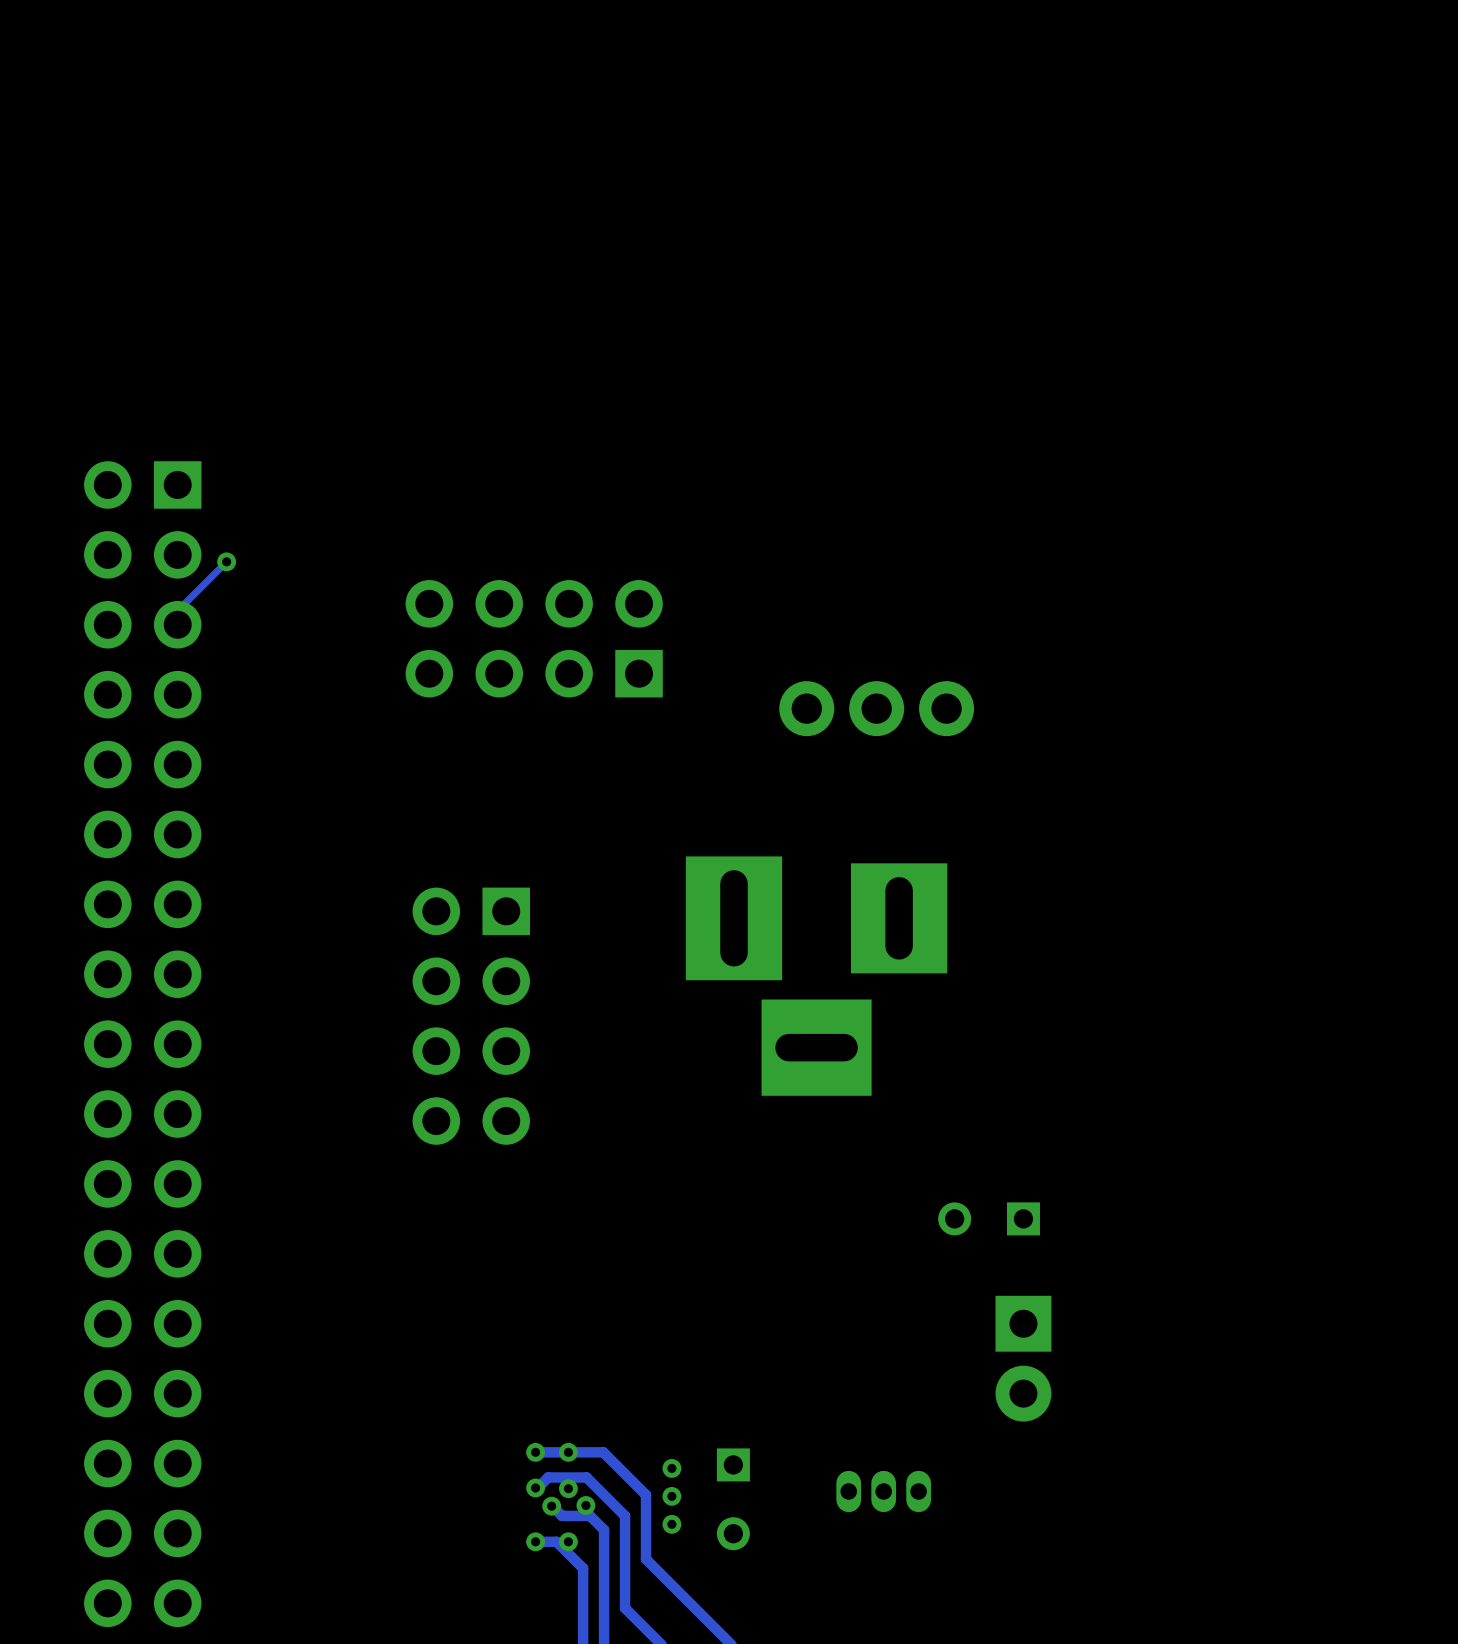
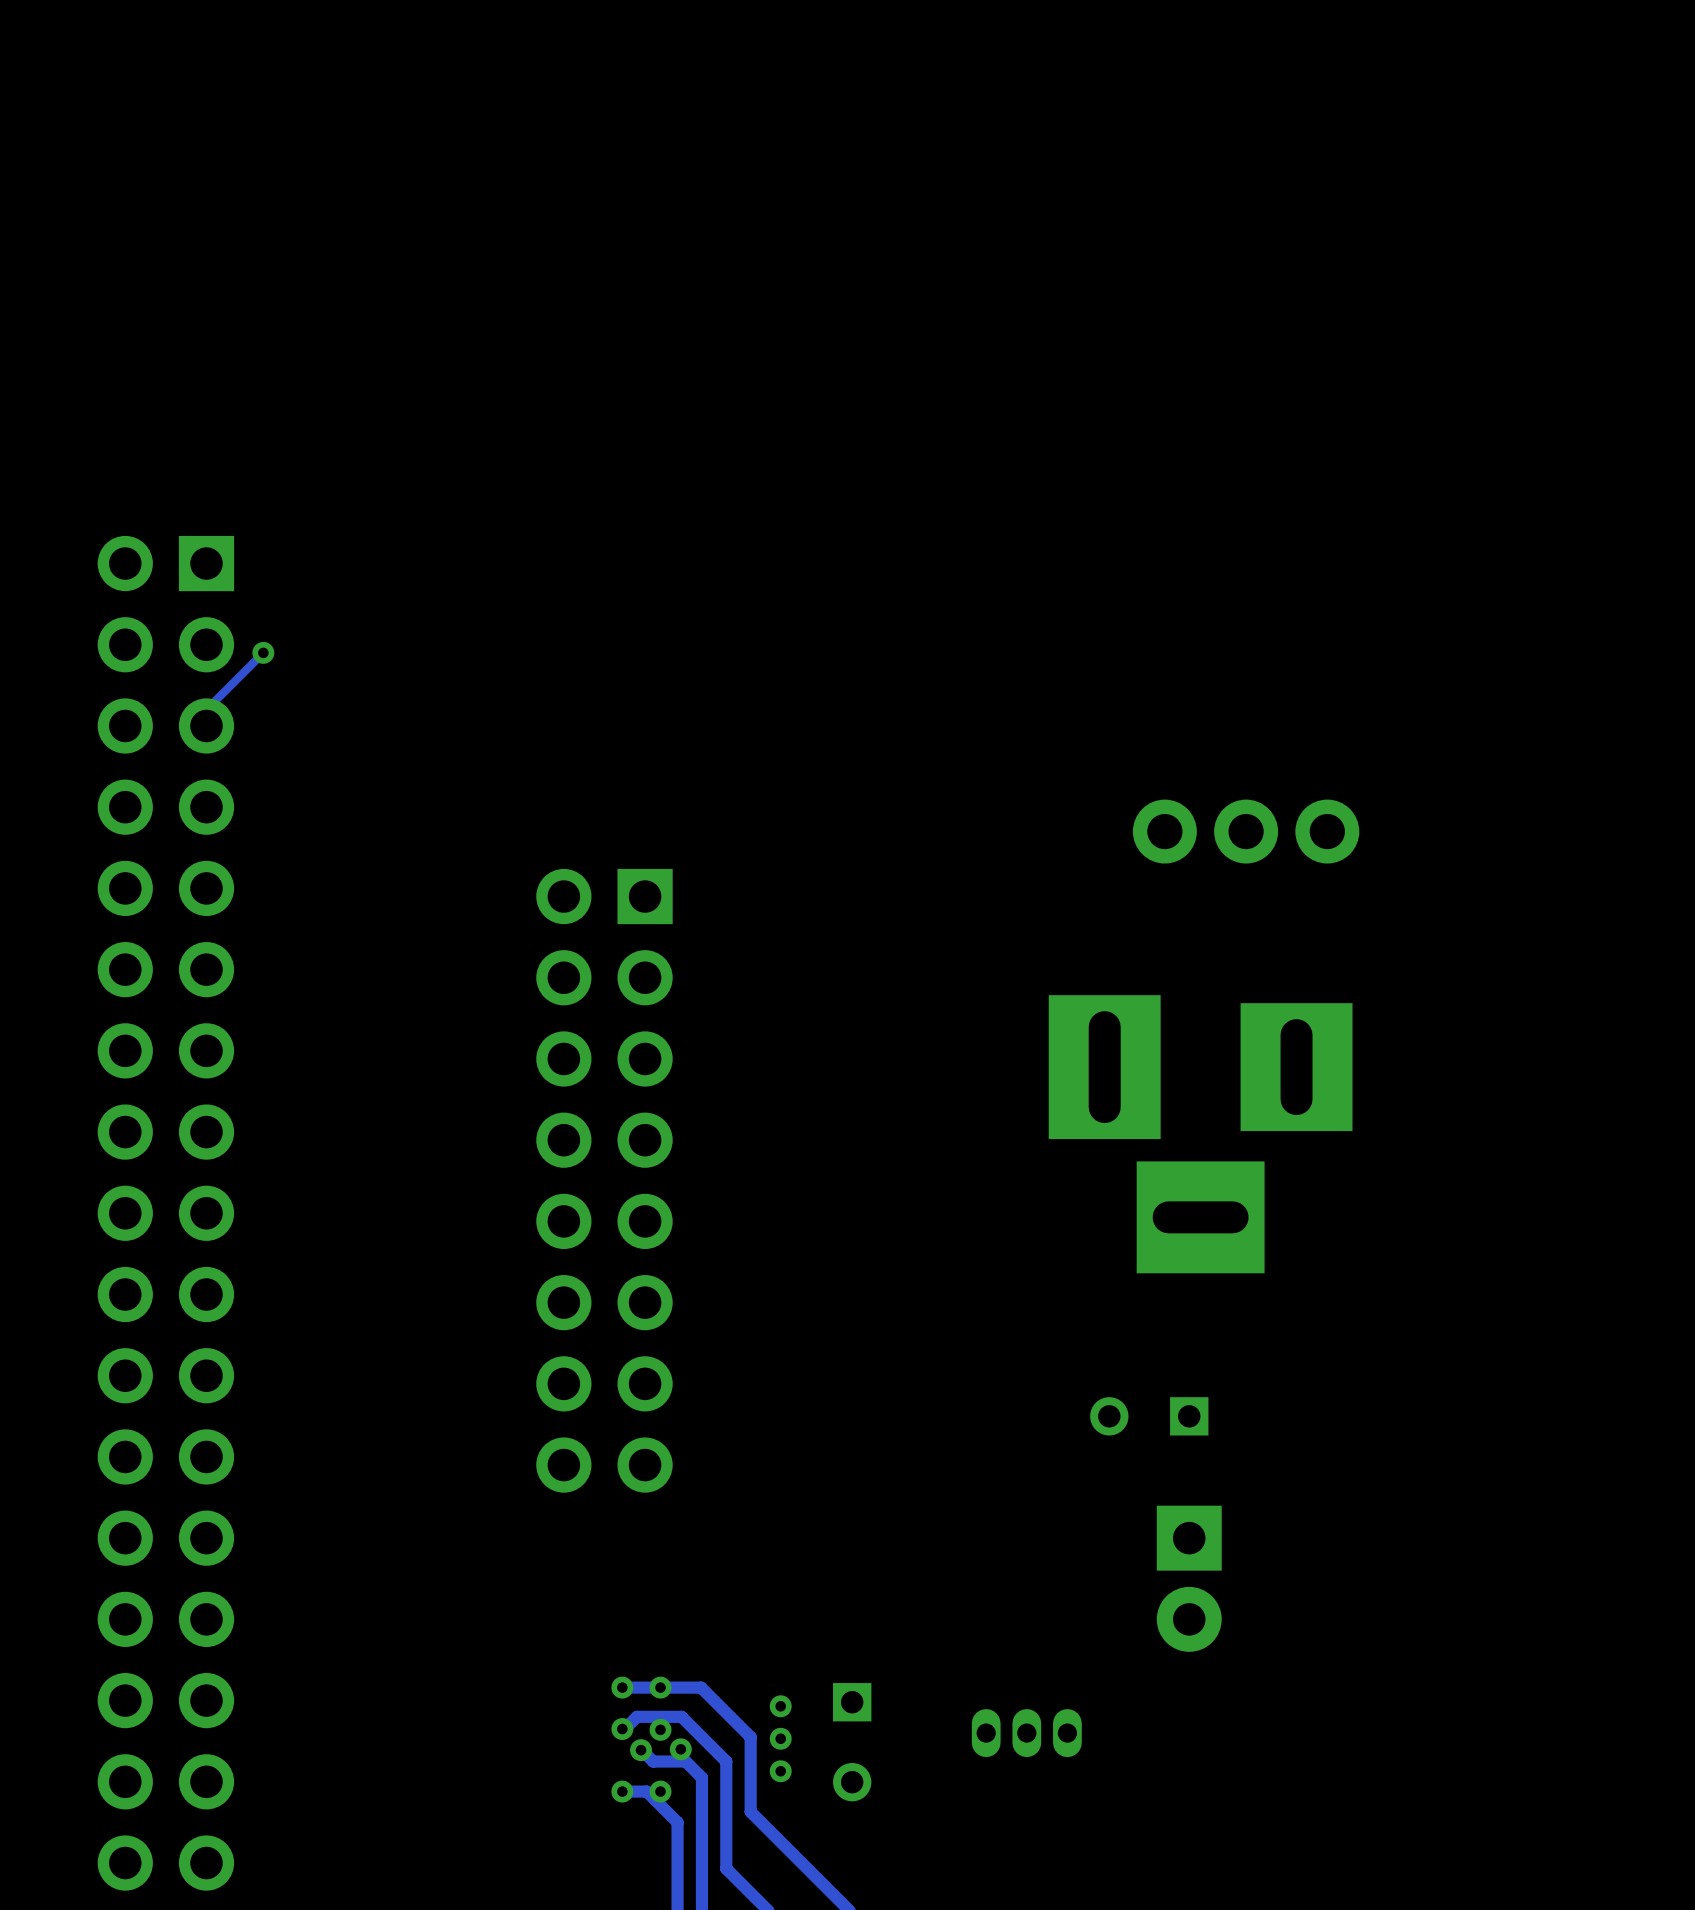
part: (534, 638) -> none
part position: (876, 708) -> (1246, 831)
part position: (816, 976) -> (1200, 1134)
part: (471, 1016) -> none
part: none -> (604, 1180)

